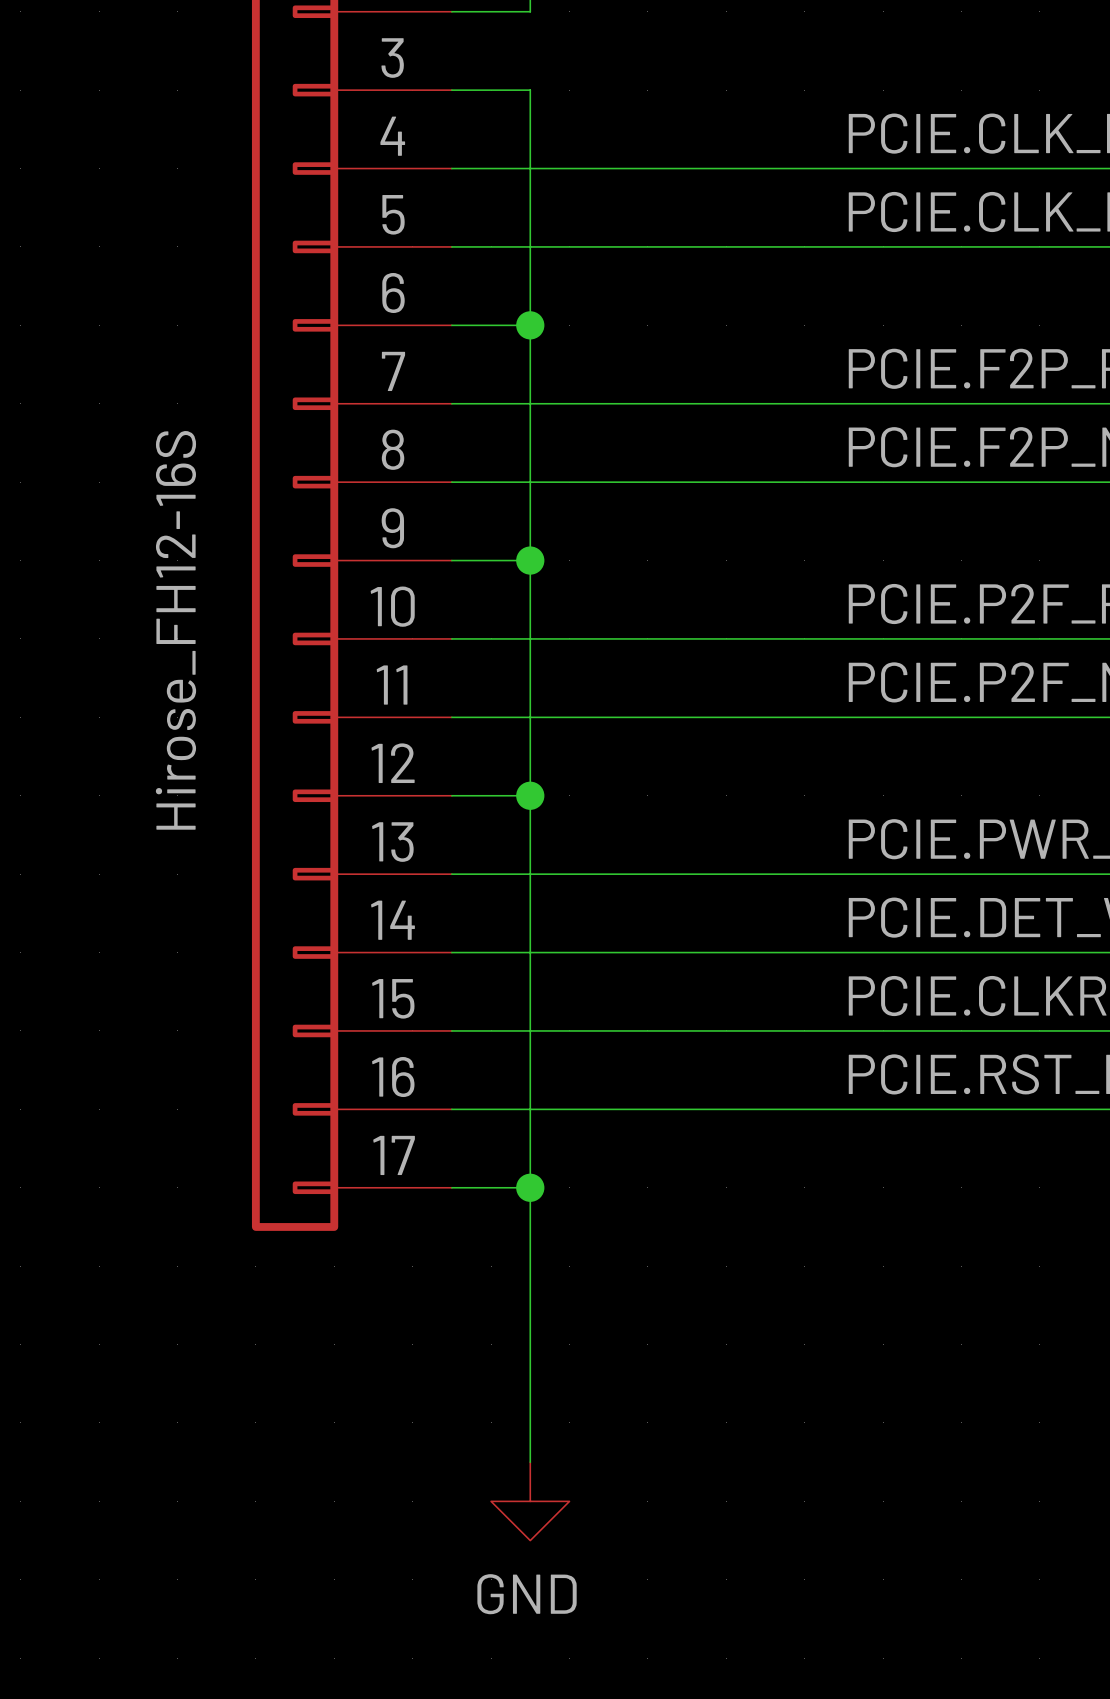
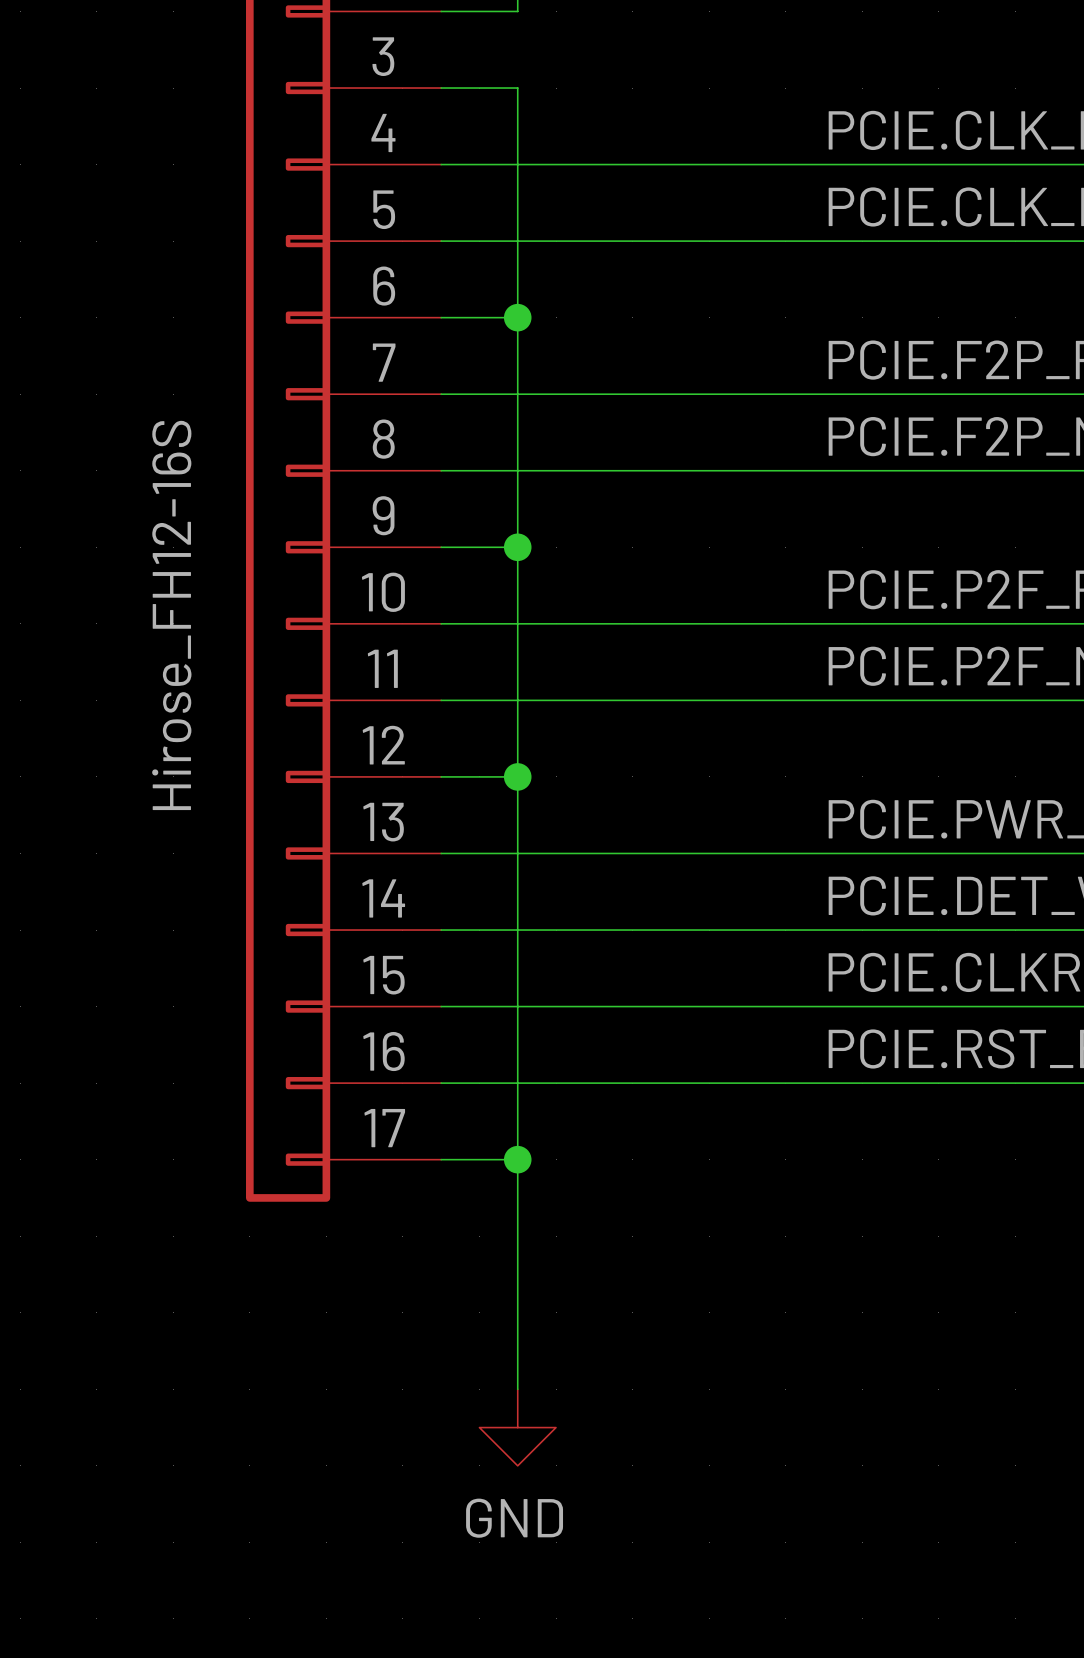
power symbol position: GND (530, 1501) -> GND (517, 1427)

